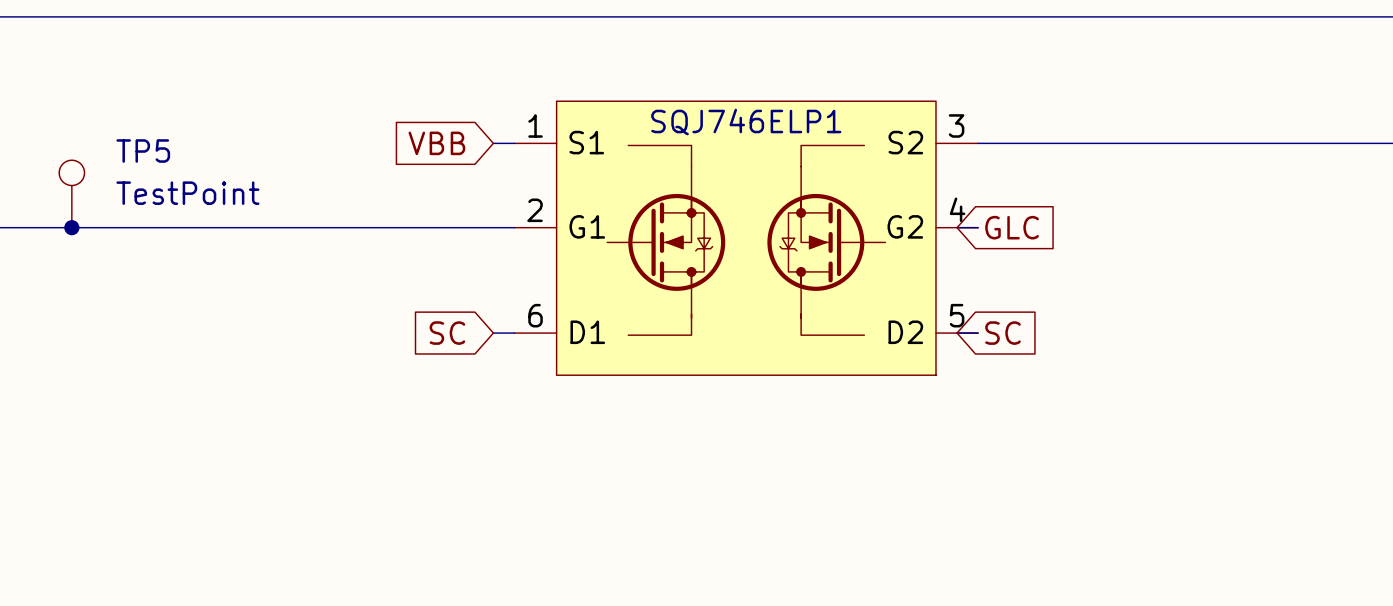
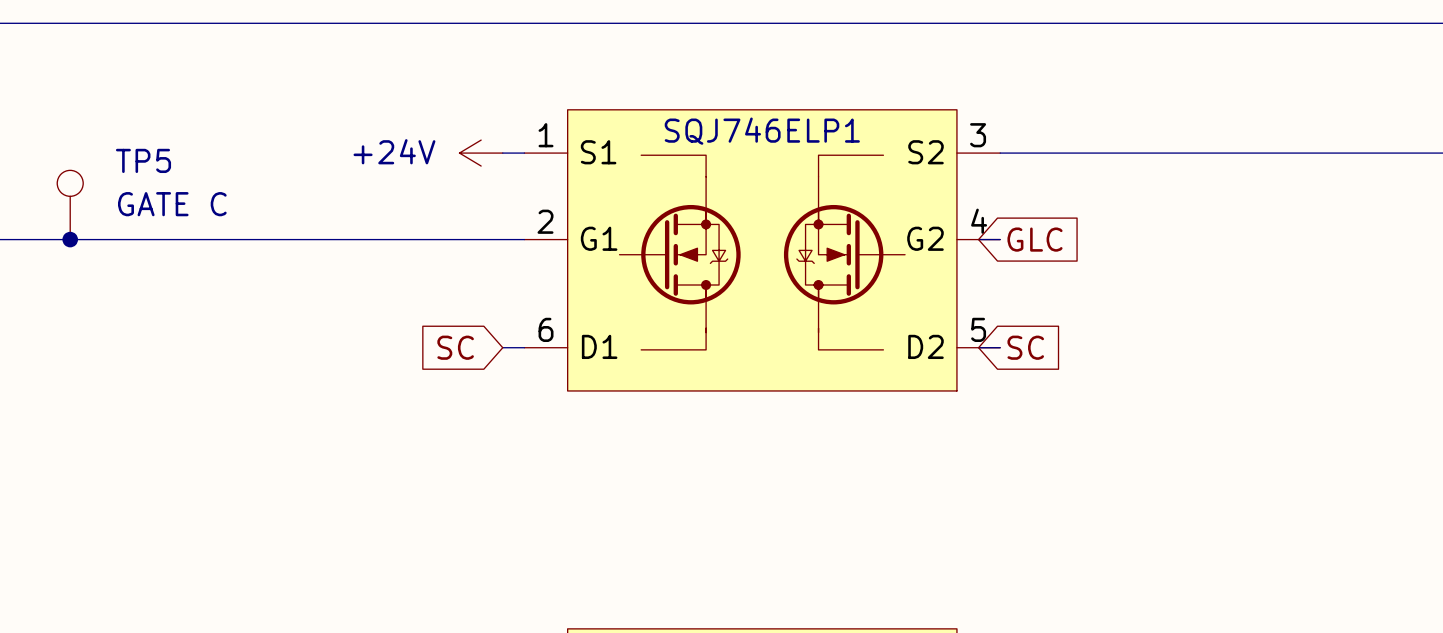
global label: VBB (436, 143) -> none
power symbol: none -> +24V (481, 153)
TP5 value: TestPoint (187, 193) -> GATE C (172, 204)

